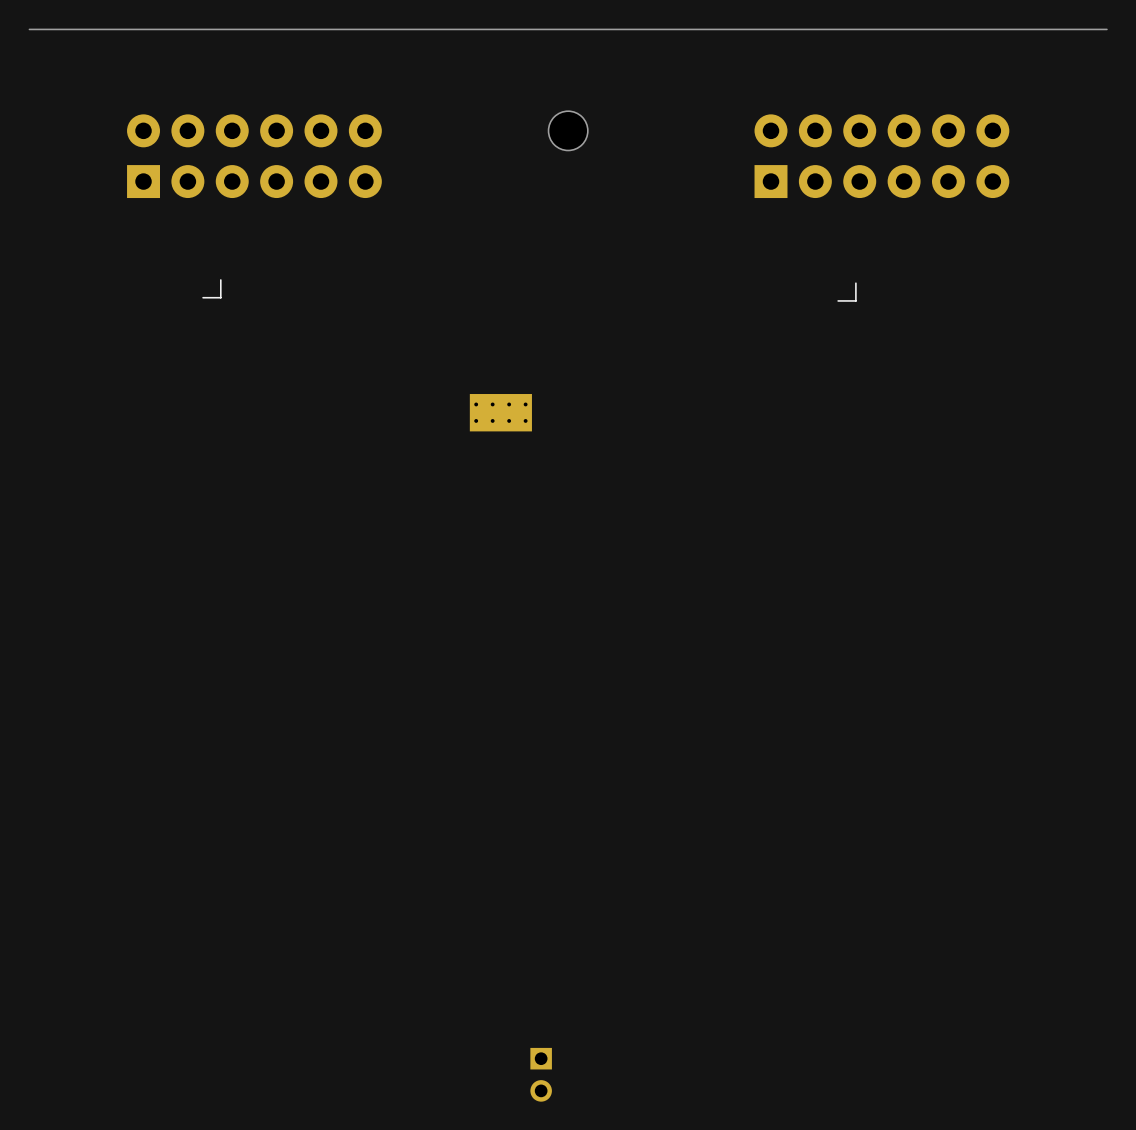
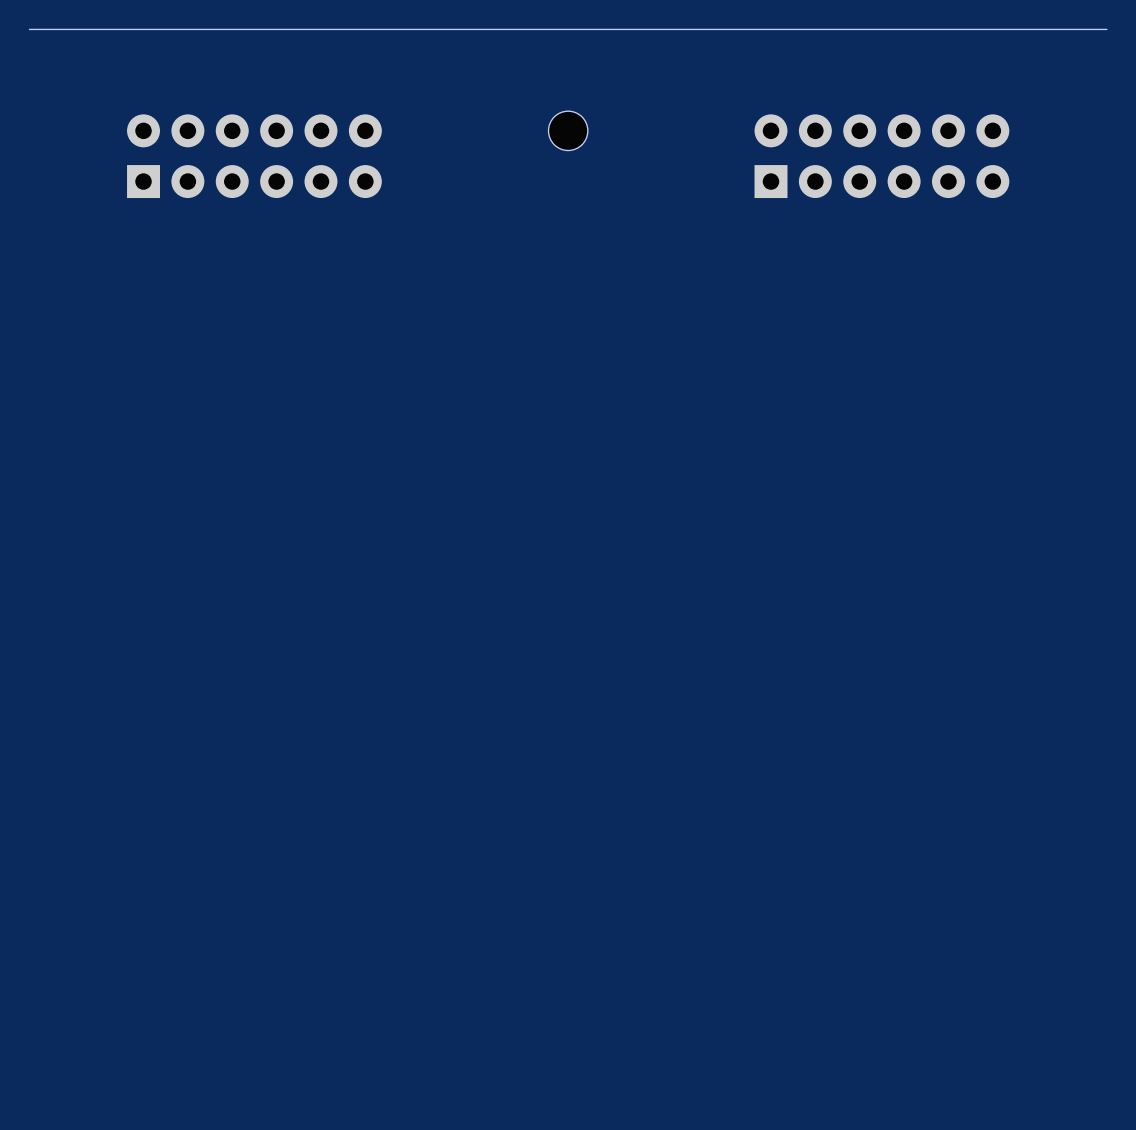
part: (211, 288) -> none
part: (847, 292) -> none
part: (500, 412) -> none
part: (541, 1074) -> none

